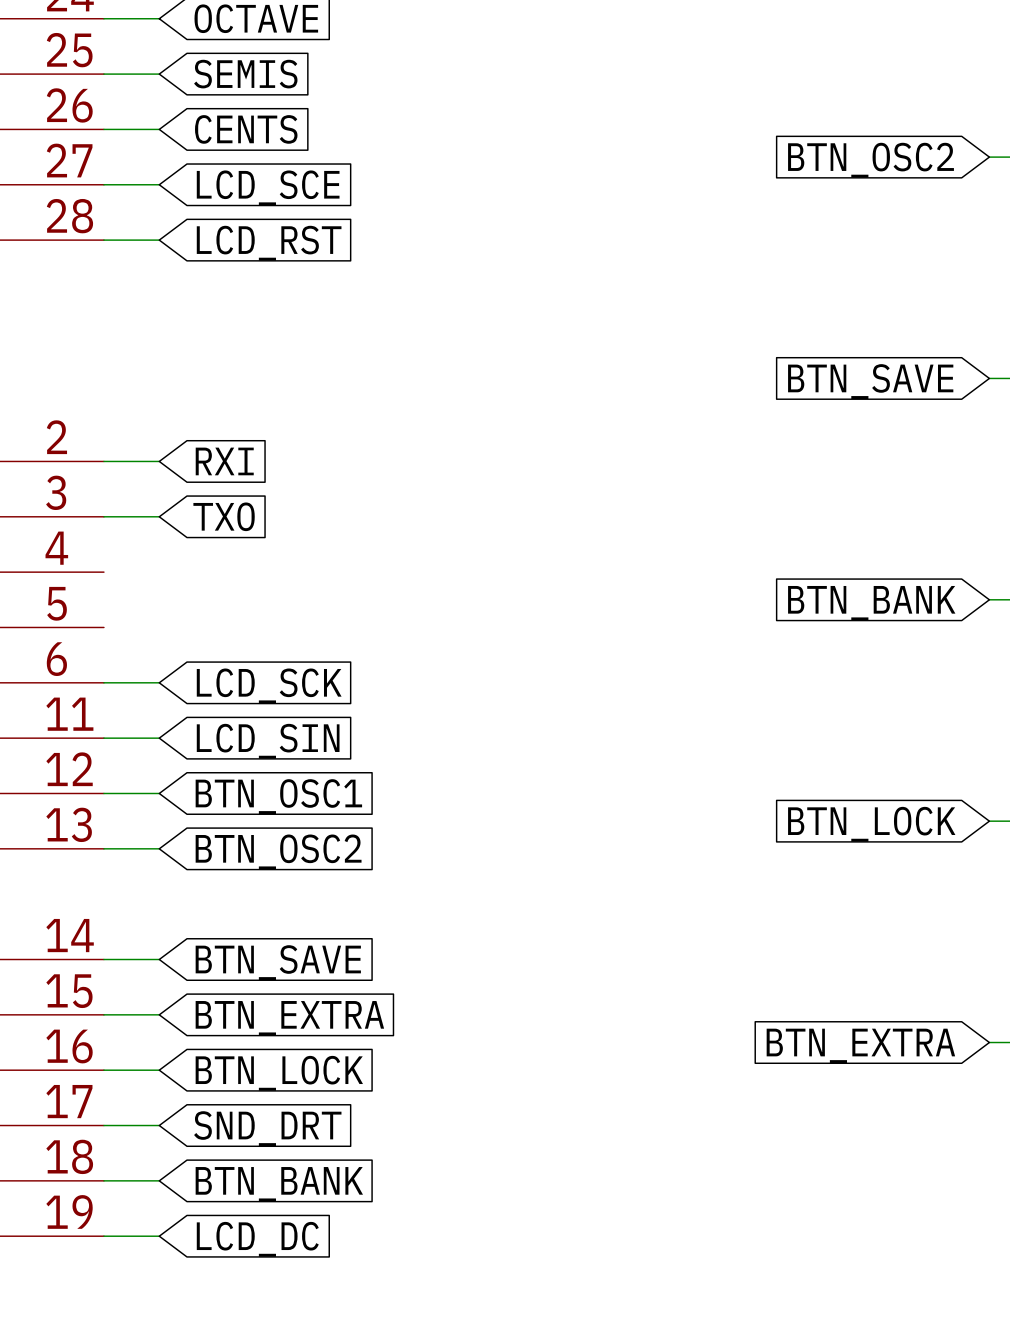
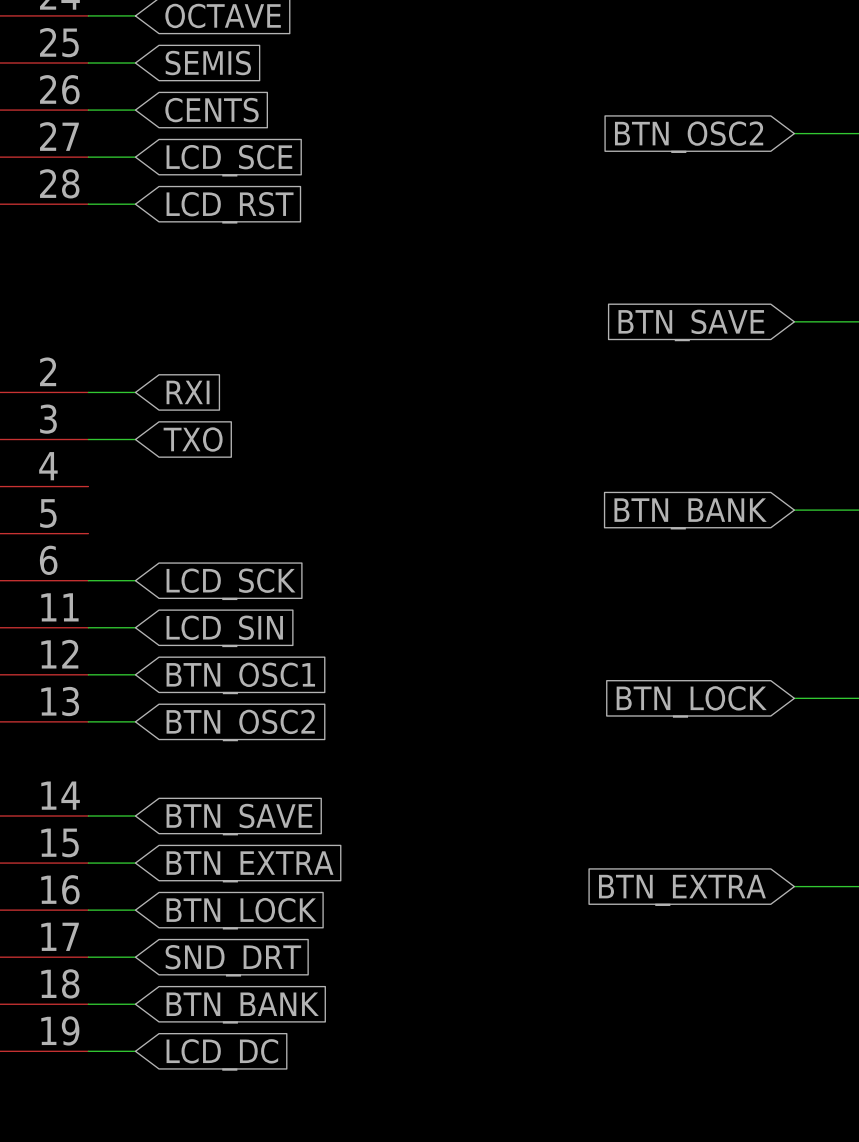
wire: none -> (794, 133) (841, 133)
global label position: BTN_OSC2 (871, 160) -> BTN_OSC2 (689, 137)
wire: none -> (794, 321) (841, 321)
global label position: BTN_SAVE (870, 381) -> BTN_SAVE (691, 325)
wire: none -> (794, 510) (841, 510)
global label position: BTN_BANK (871, 603) -> BTN_BANK (690, 513)
wire: none -> (794, 698) (841, 698)
global label position: BTN_LOCK (871, 824) -> BTN_LOCK (691, 701)
wire: none -> (794, 886) (841, 886)
global label position: BTN_EXTRA (860, 1045) -> BTN_EXTRA (682, 890)

